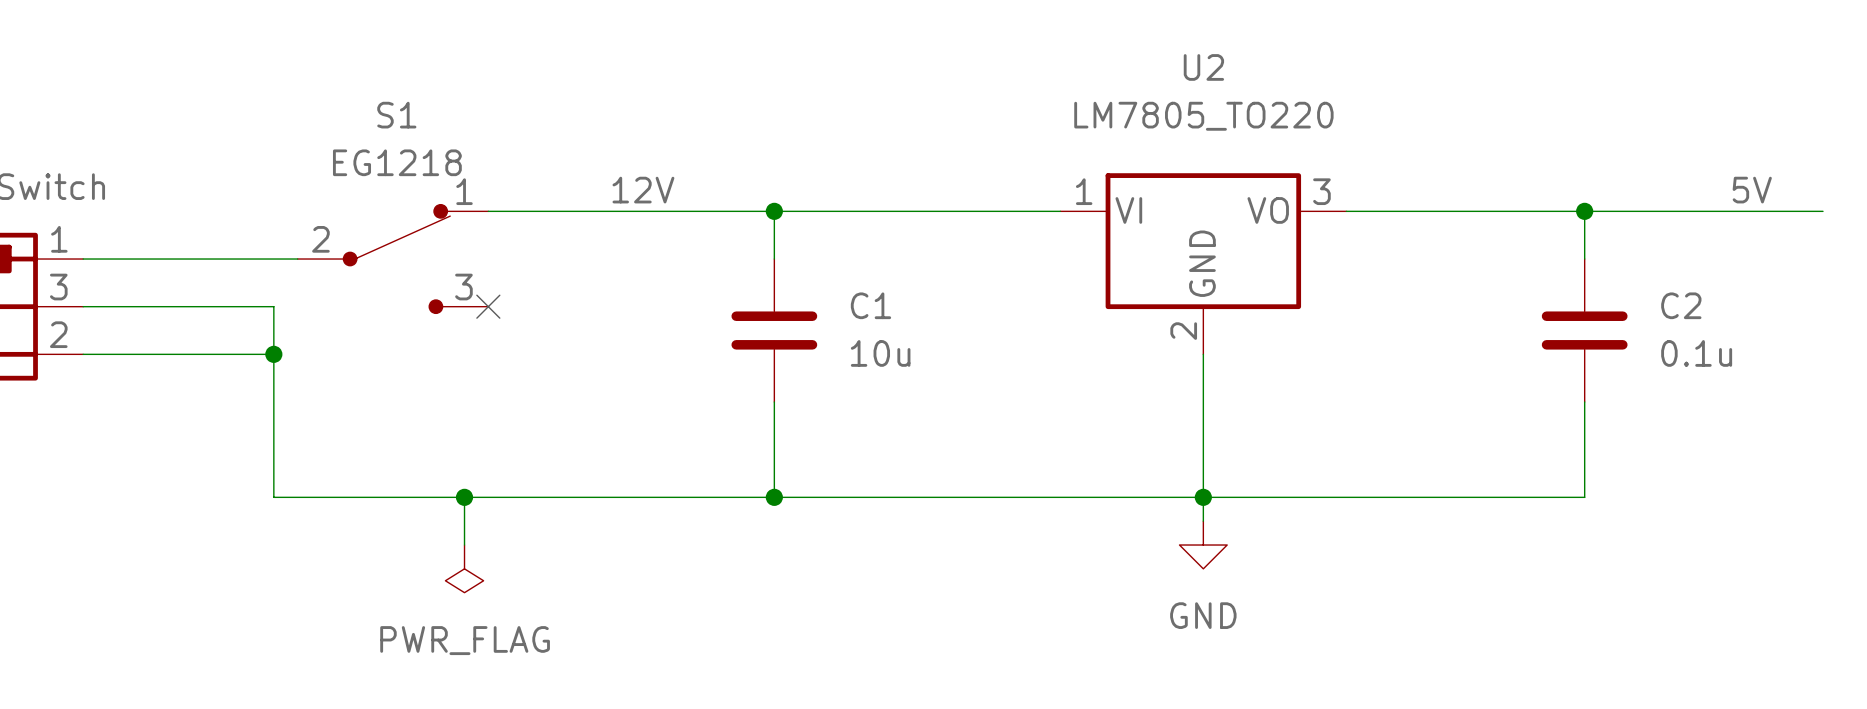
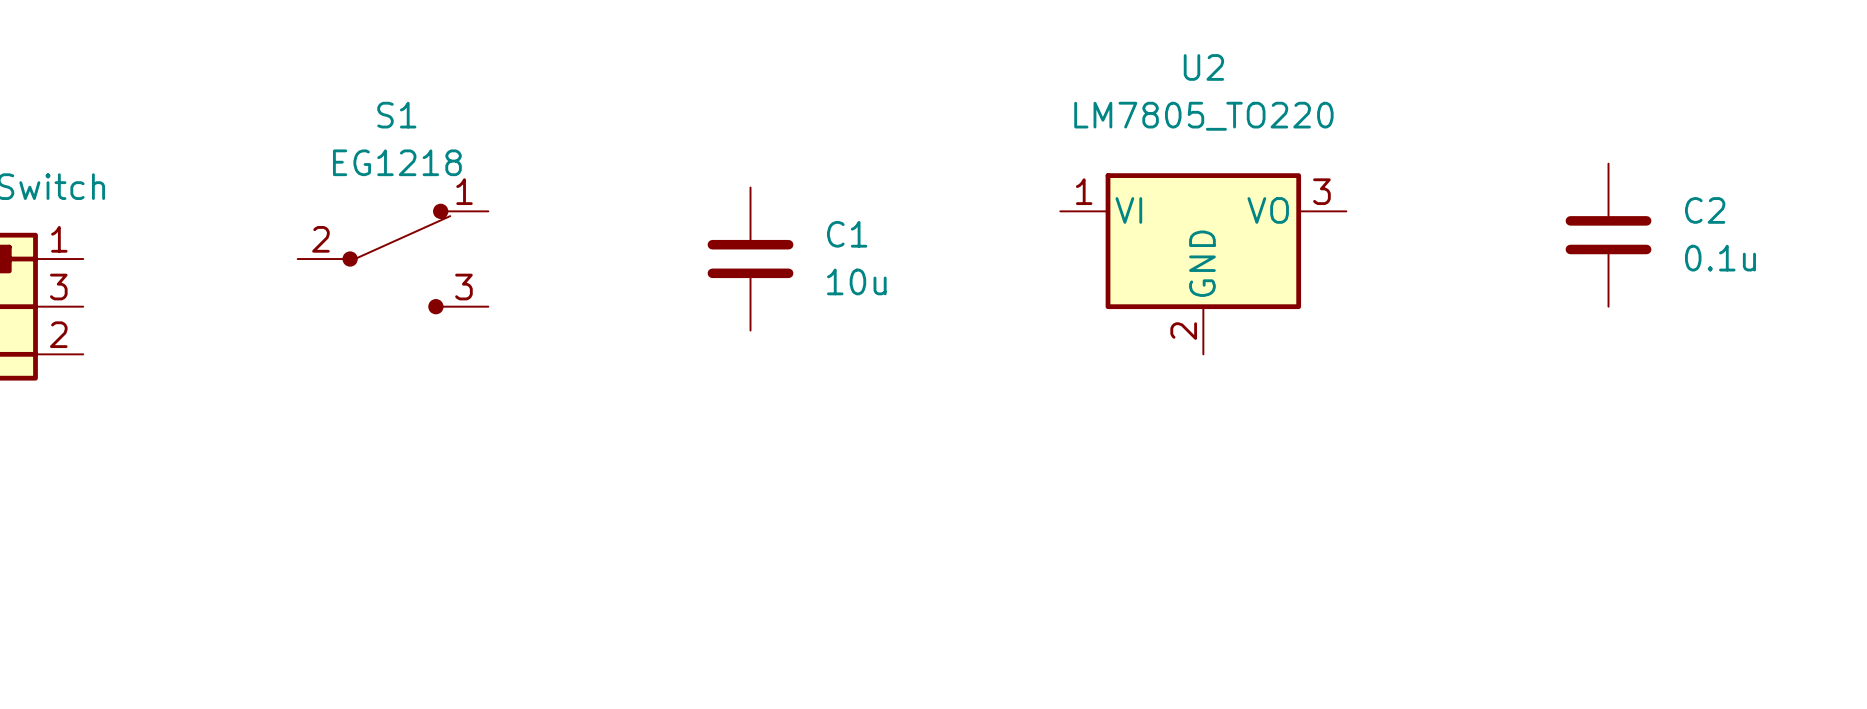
label: 12V (643, 190) -> none
label: 5V (1752, 190) -> none
wire: (488, 211) (1060, 211) -> none
wire: (774, 211) (774, 259) -> none
junction: (774, 211) -> none
wire: (1346, 211) (1823, 211) -> none
wire: (1584, 211) (1584, 259) -> none
junction: (1584, 211) -> none
wire: (83, 259) (297, 259) -> none
wire: (83, 306) (273, 306) (273, 497) (1584, 497) (1584, 402) -> none
no-connect mark: (488, 306) -> none
C1 position: (774, 330) -> (750, 259)
C2 position: (1584, 330) -> (1608, 235)
wire: (83, 354) (273, 354) -> none
junction: (273, 354) -> none
wire: (1203, 354) (1203, 521) -> none
wire: (774, 402) (774, 497) -> none
wire: (464, 497) (464, 545) -> none
junction: (464, 497) -> none
junction: (774, 497) -> none
junction: (1203, 497) -> none
power symbol: GND (1203, 545) -> none
power symbol: PWR_FLAG (464, 568) -> none

